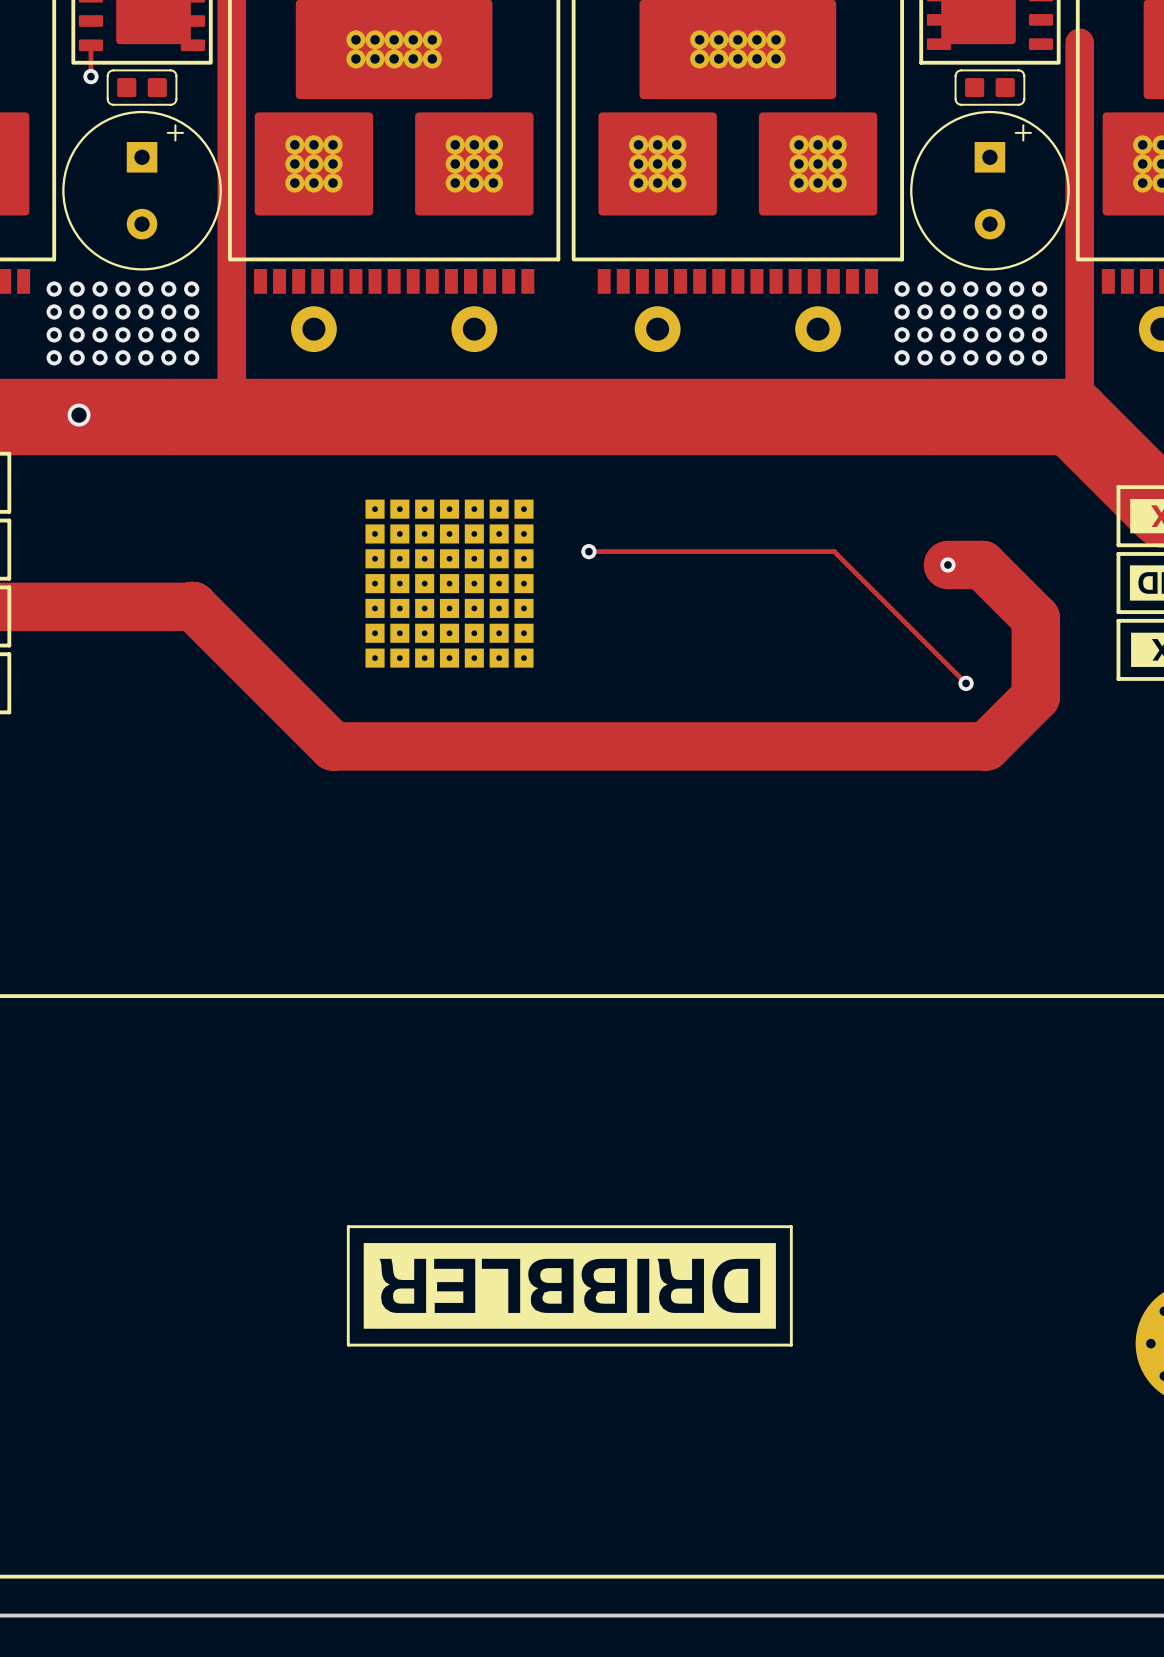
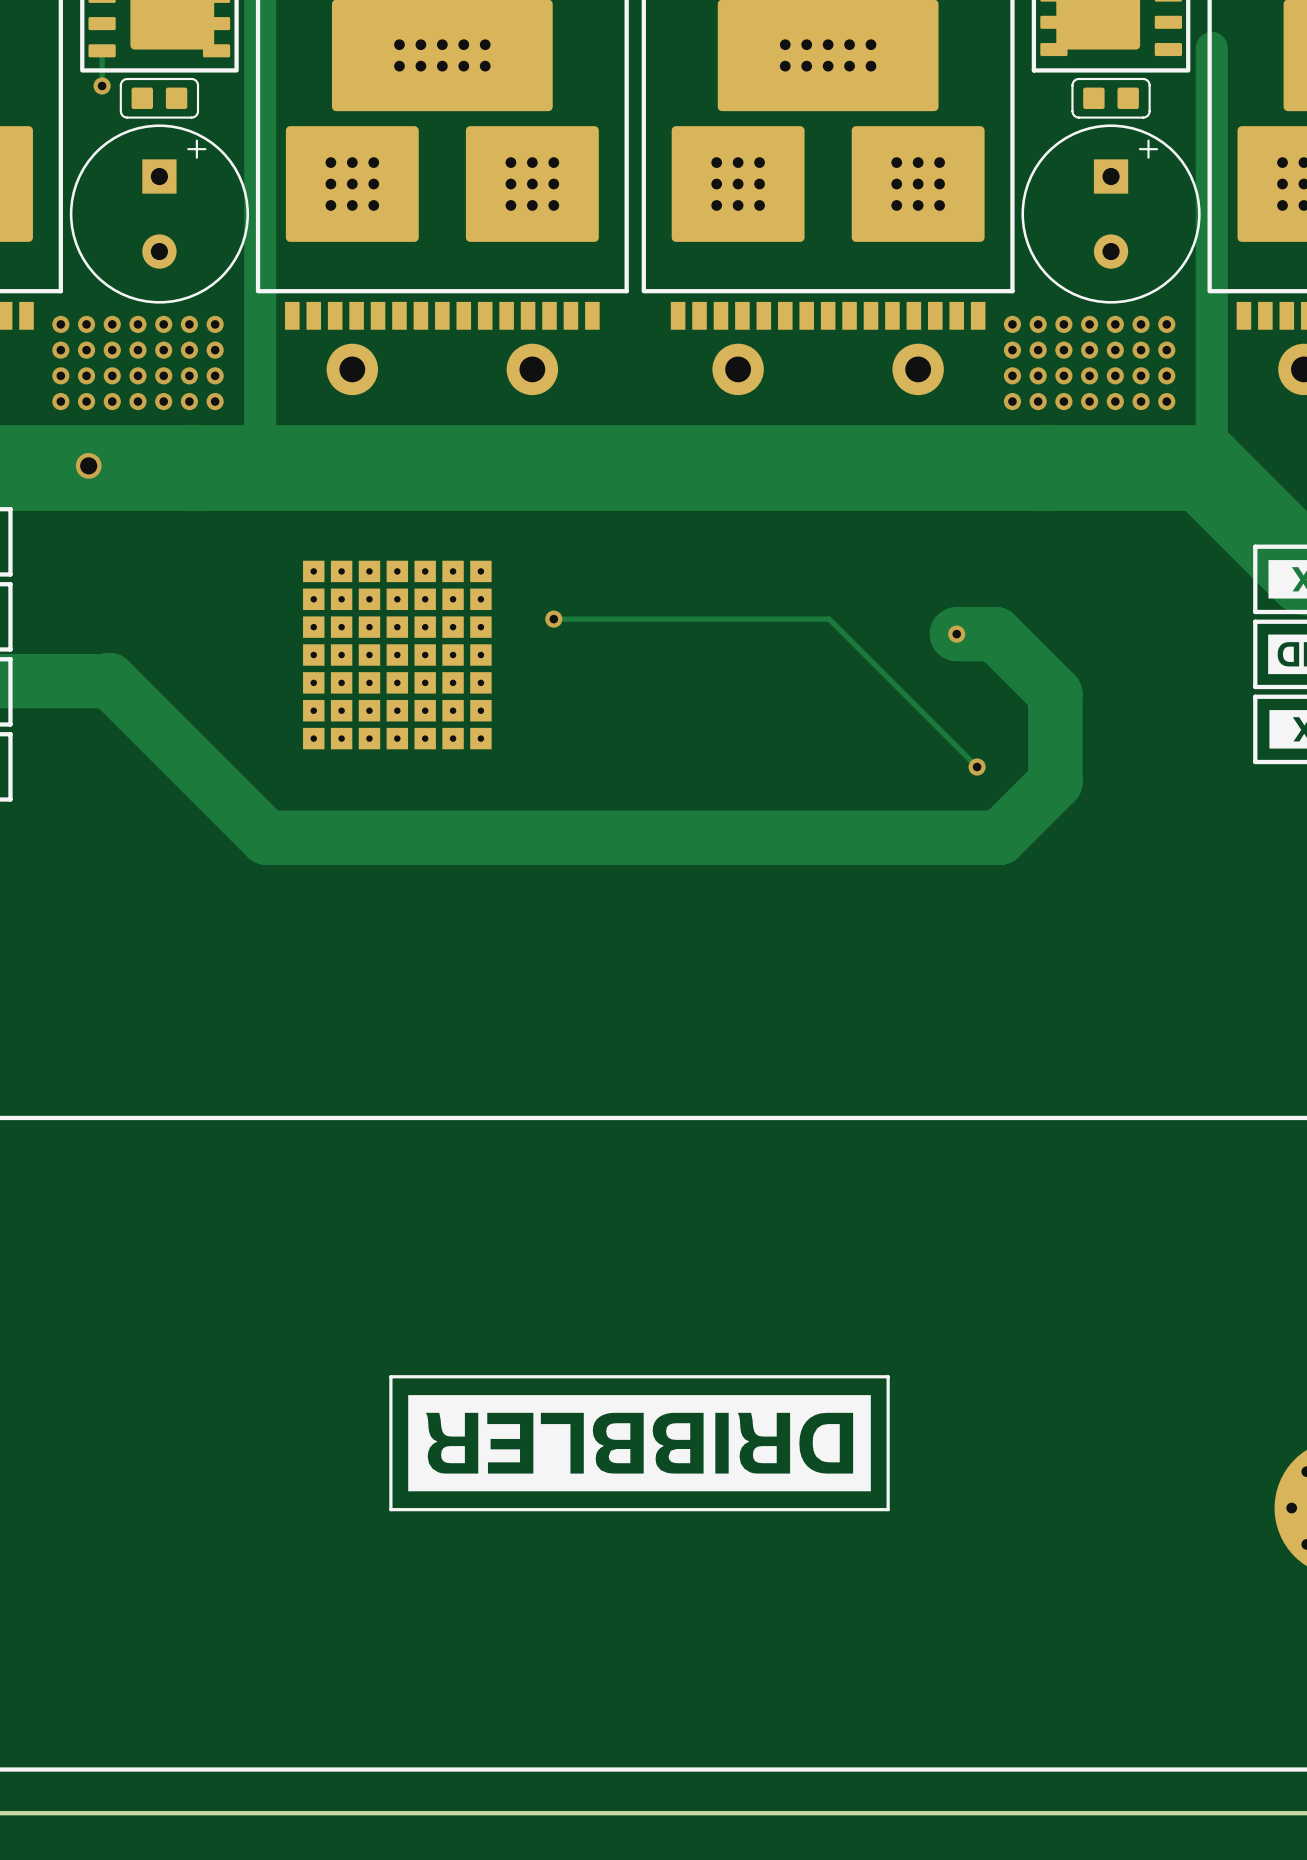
track: none -> (553, 619) (660, 619)
via position: (588, 551) -> (553, 619)
track: (738, 551) (834, 551) (966, 683) -> (829, 619) (977, 766)
via: none -> (956, 634)
track: (947, 564) (982, 564) (1035, 618) (1035, 696) (986, 746) (890, 746) -> (956, 634) (995, 634) (1055, 694) (1055, 782) (999, 837)
via: (947, 564) -> none
part position: (449, 583) -> (397, 655)
track: (96, 606) (192, 605) (333, 746) -> (108, 681) (109, 680) (266, 837) (373, 837)
via: none -> (977, 766)
via: (966, 683) -> none

